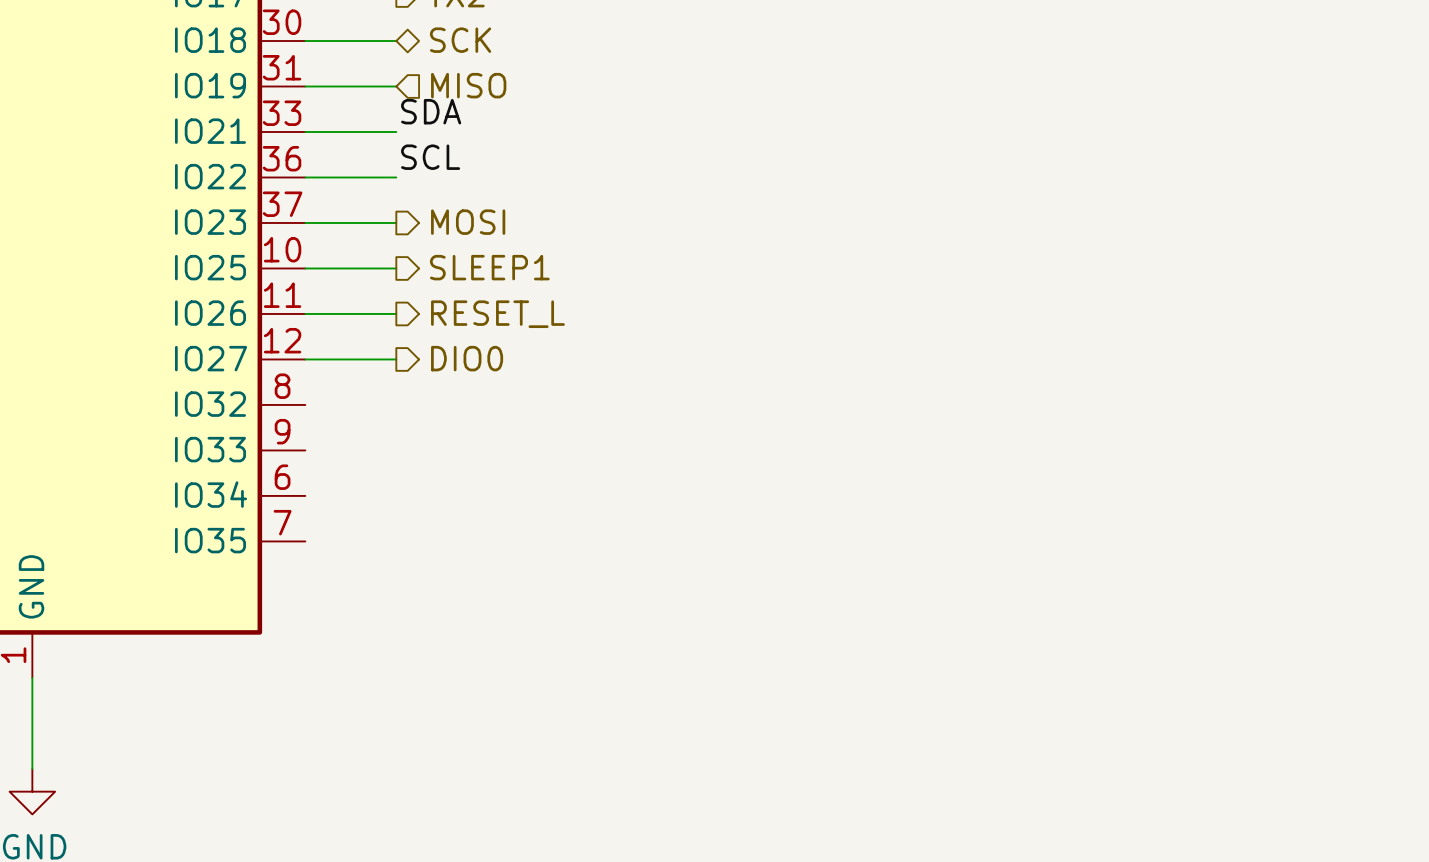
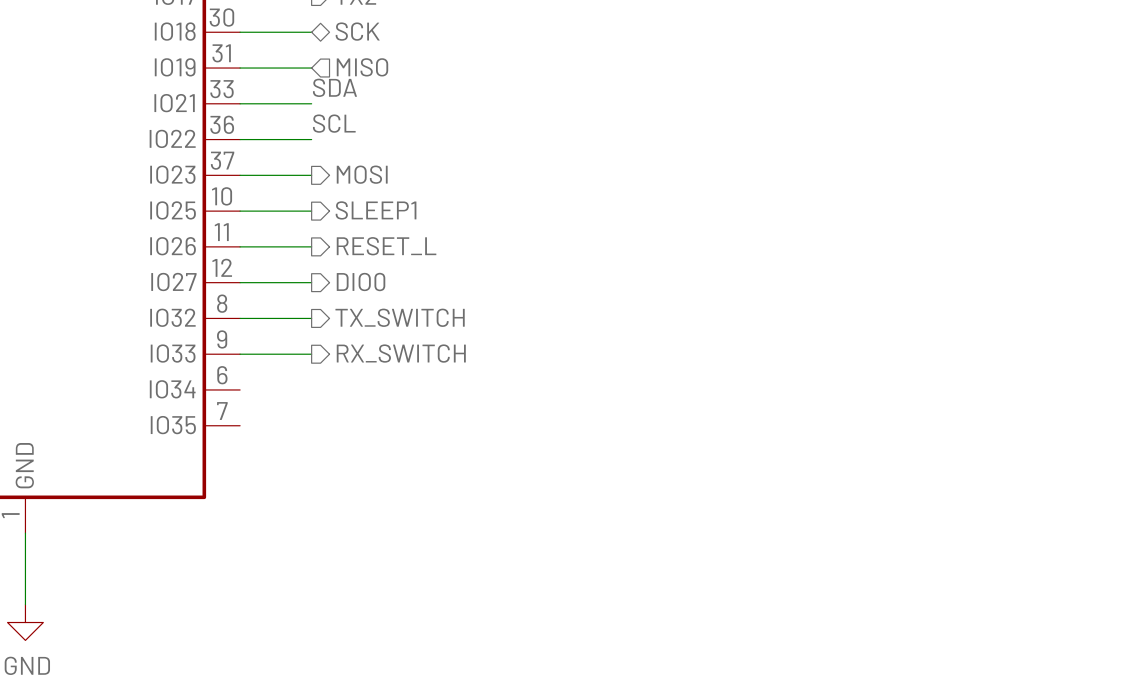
wire: none -> (240, 318) (311, 318)
hierarchical label: none -> TX_SWITCH (400, 317)
wire: none -> (240, 354) (311, 354)
hierarchical label: none -> RX_SWITCH (401, 353)

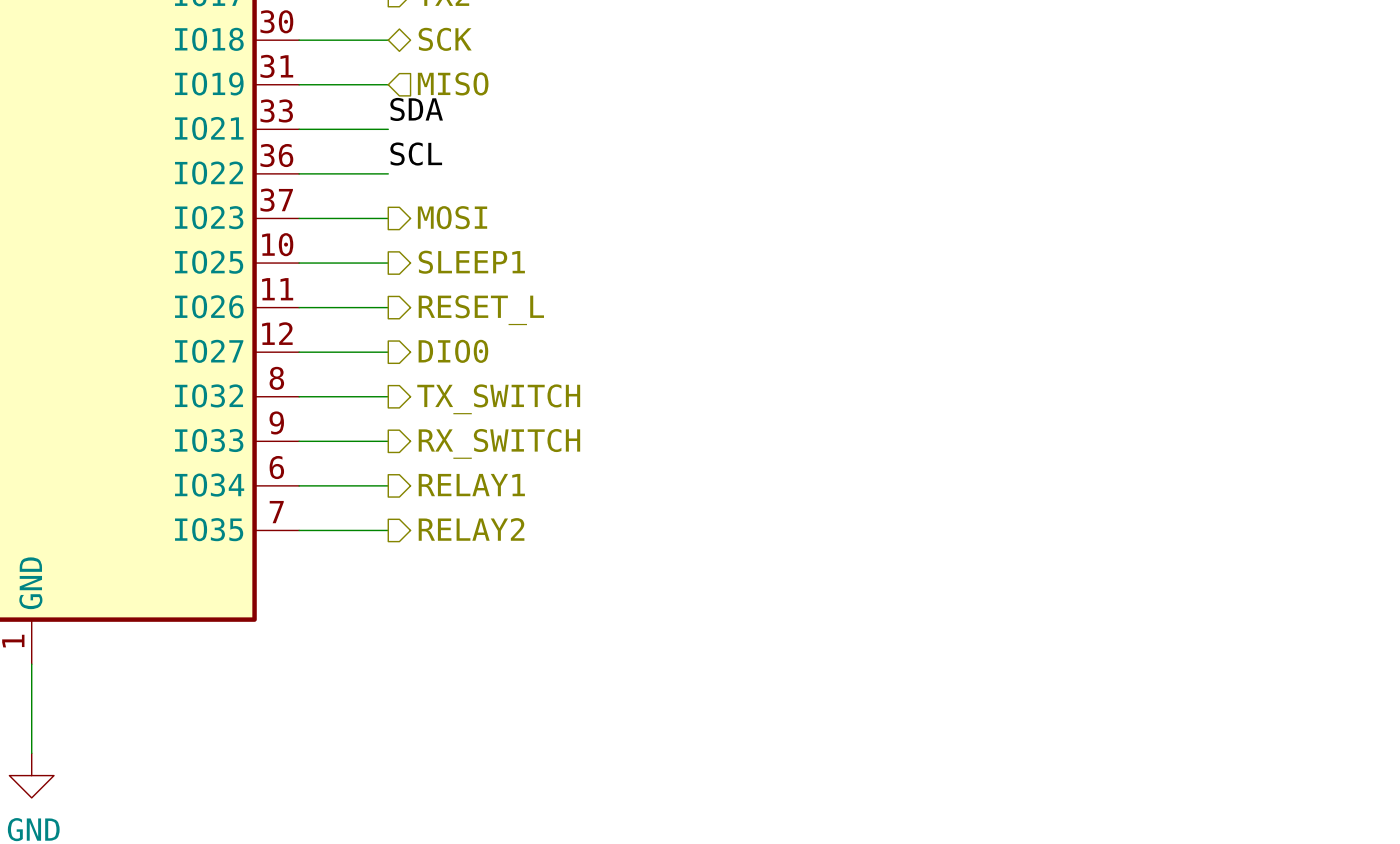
wire: none -> (299, 485) (388, 485)
hierarchical label: none -> RELAY1 (471, 485)
hierarchical label: none -> RELAY2 (471, 529)
wire: none -> (299, 530) (388, 530)

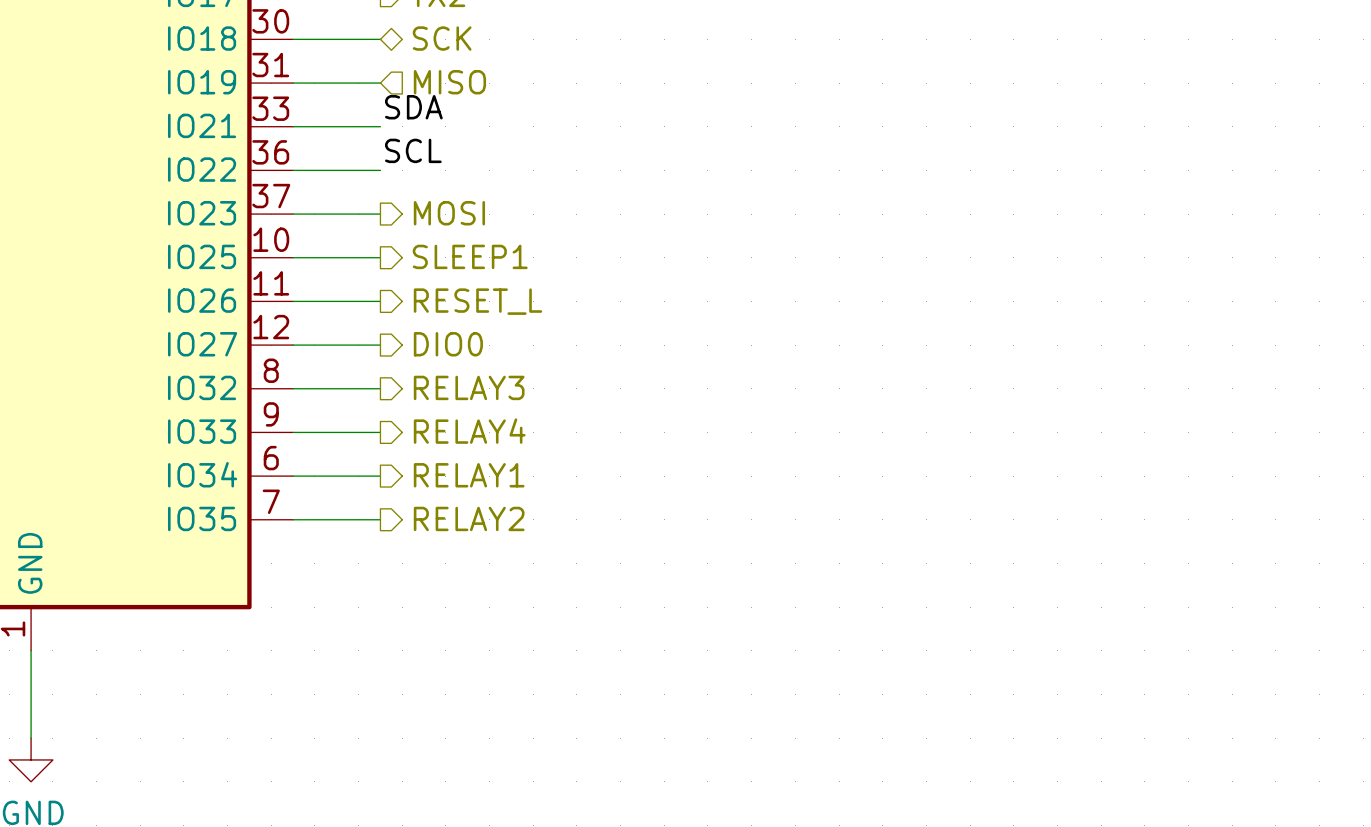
hierarchical label: TX_SWITCH (498, 399) -> RELAY3 (469, 387)
hierarchical label: RX_SWITCH (499, 443) -> RELAY4 (469, 431)

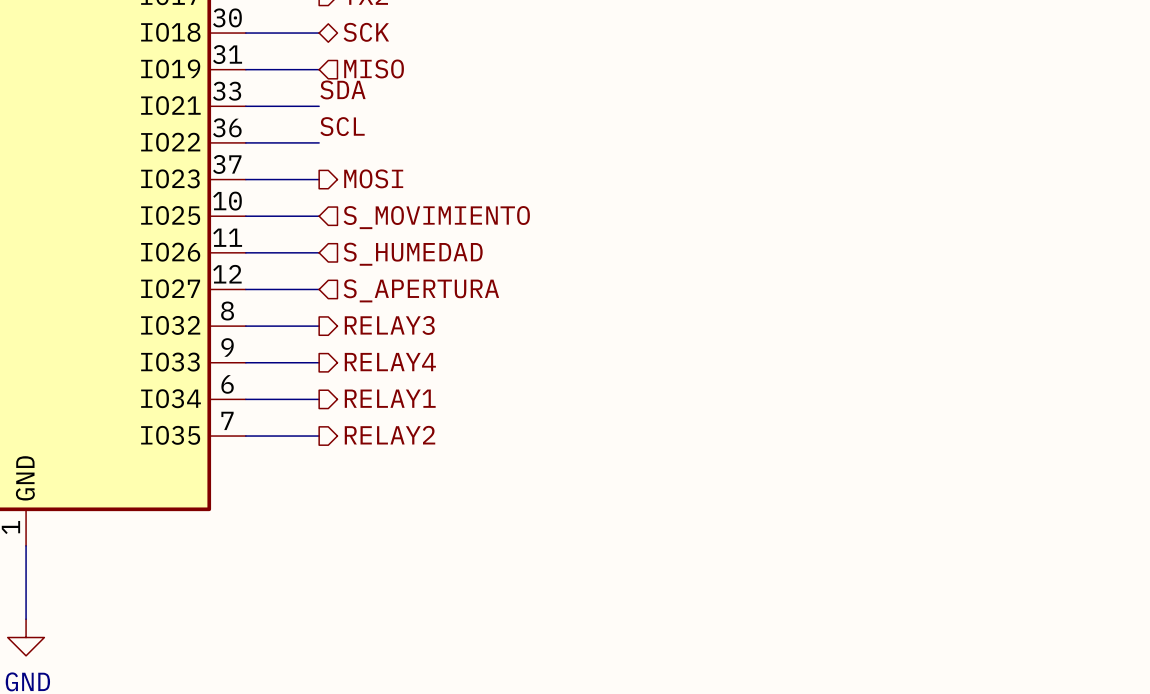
hierarchical label shape: output (470, 256) -> input (436, 217)
hierarchical label: SLEEP1 (470, 256) -> S_MOVIMIENTO (436, 217)
hierarchical label shape: output (478, 301) -> input (413, 254)
hierarchical label: RESET_L (478, 301) -> S_HUMEDAD (413, 254)
hierarchical label shape: output (448, 344) -> input (421, 290)
hierarchical label: DIO0 (448, 344) -> S_APERTURA (421, 290)

